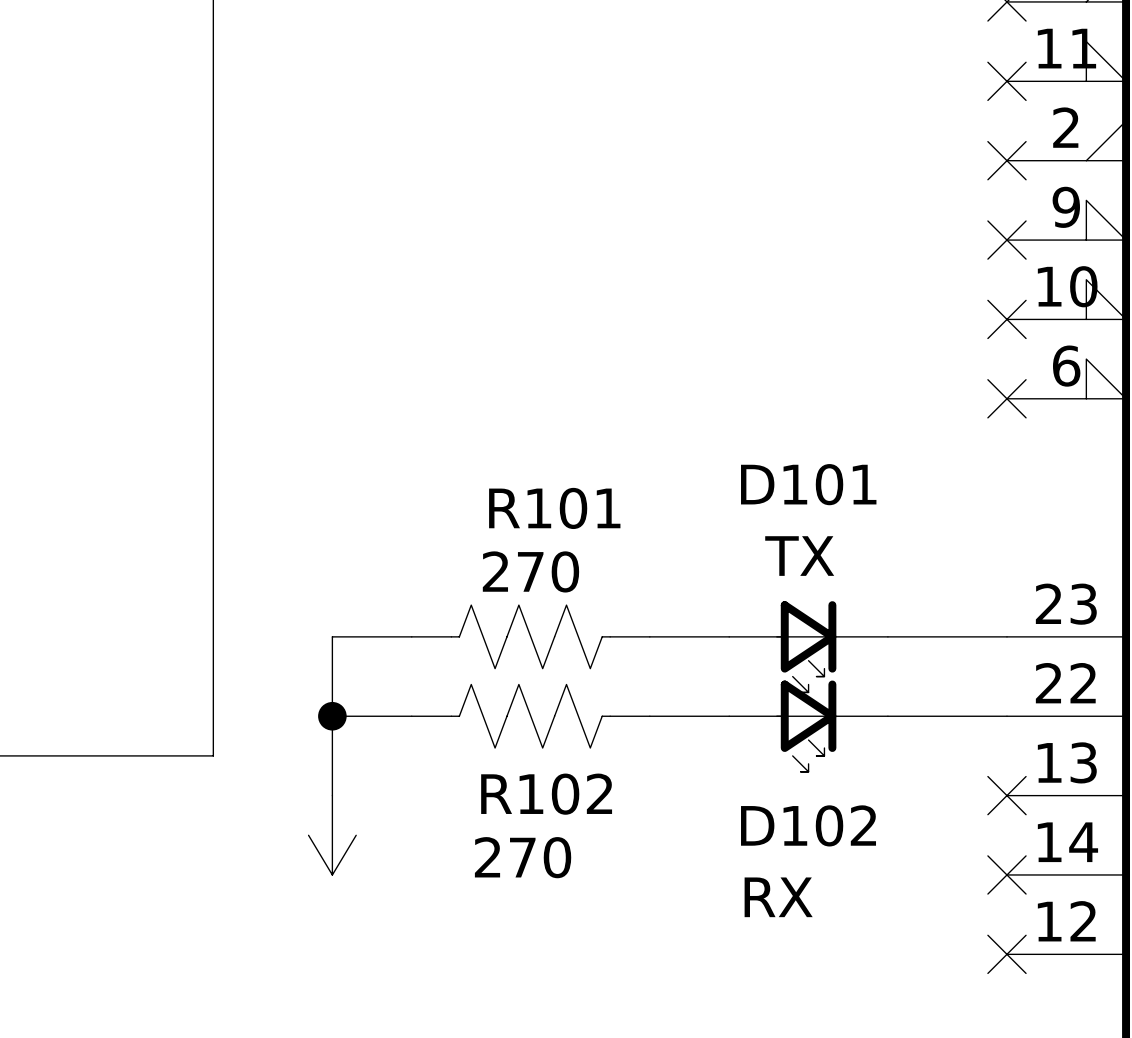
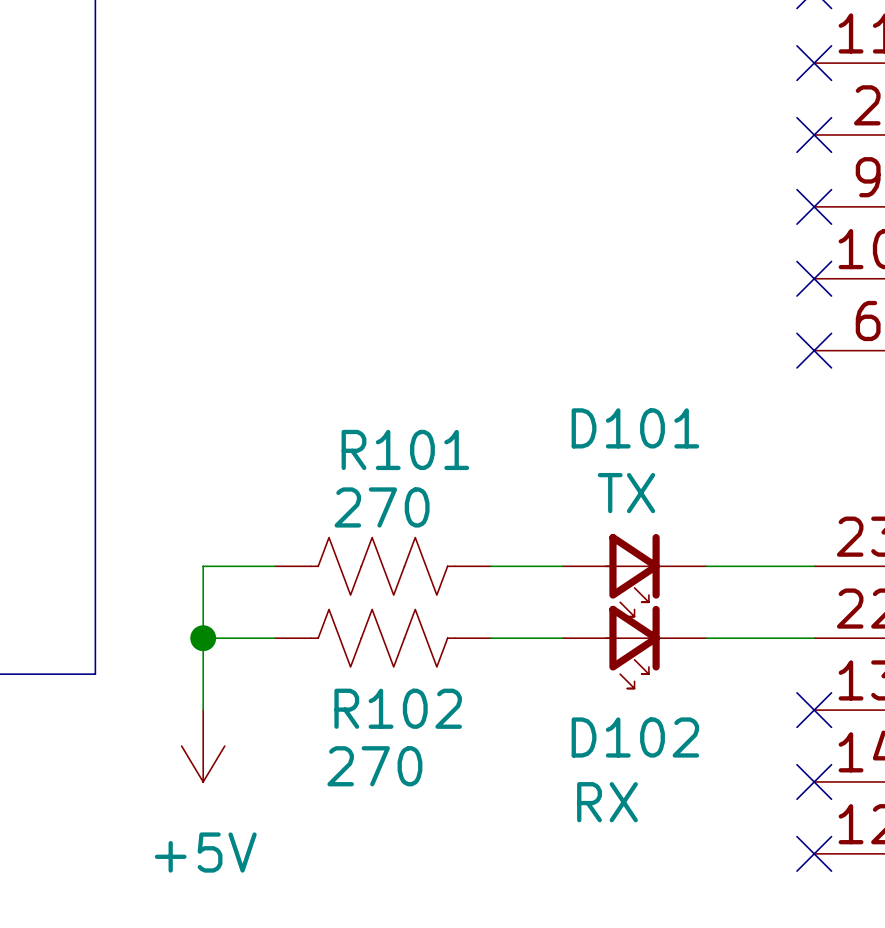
power symbol text: none -> +5V (205, 852)

